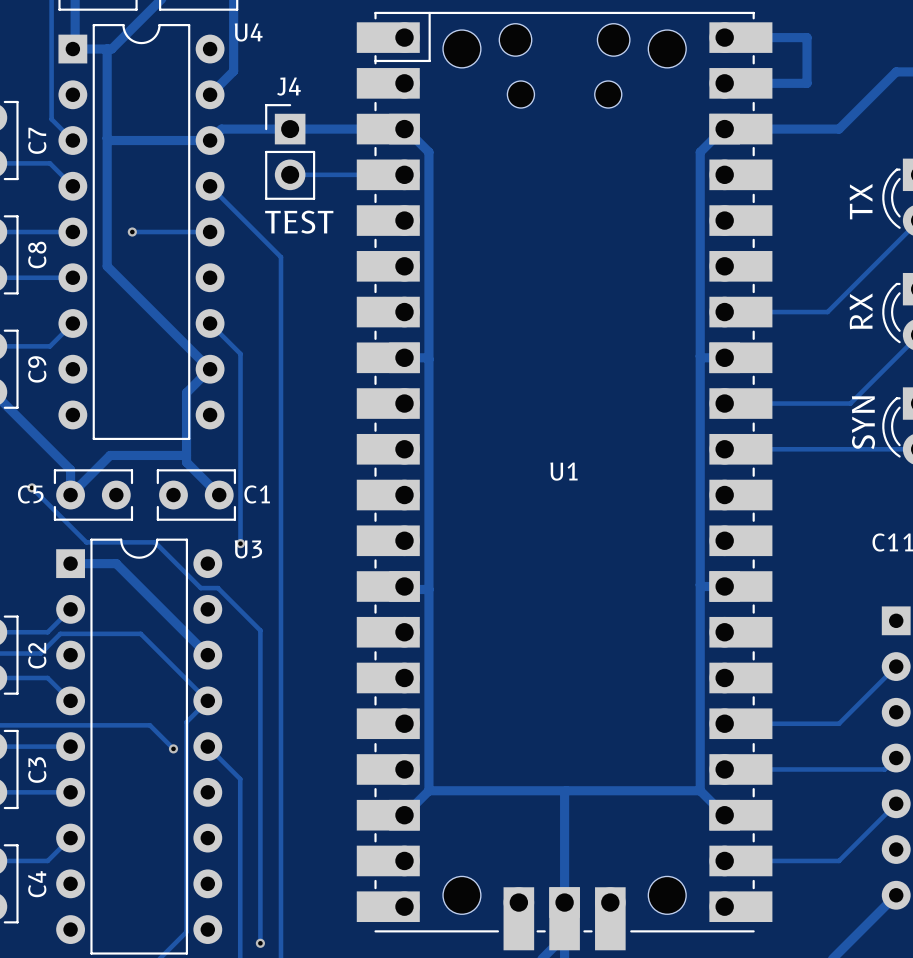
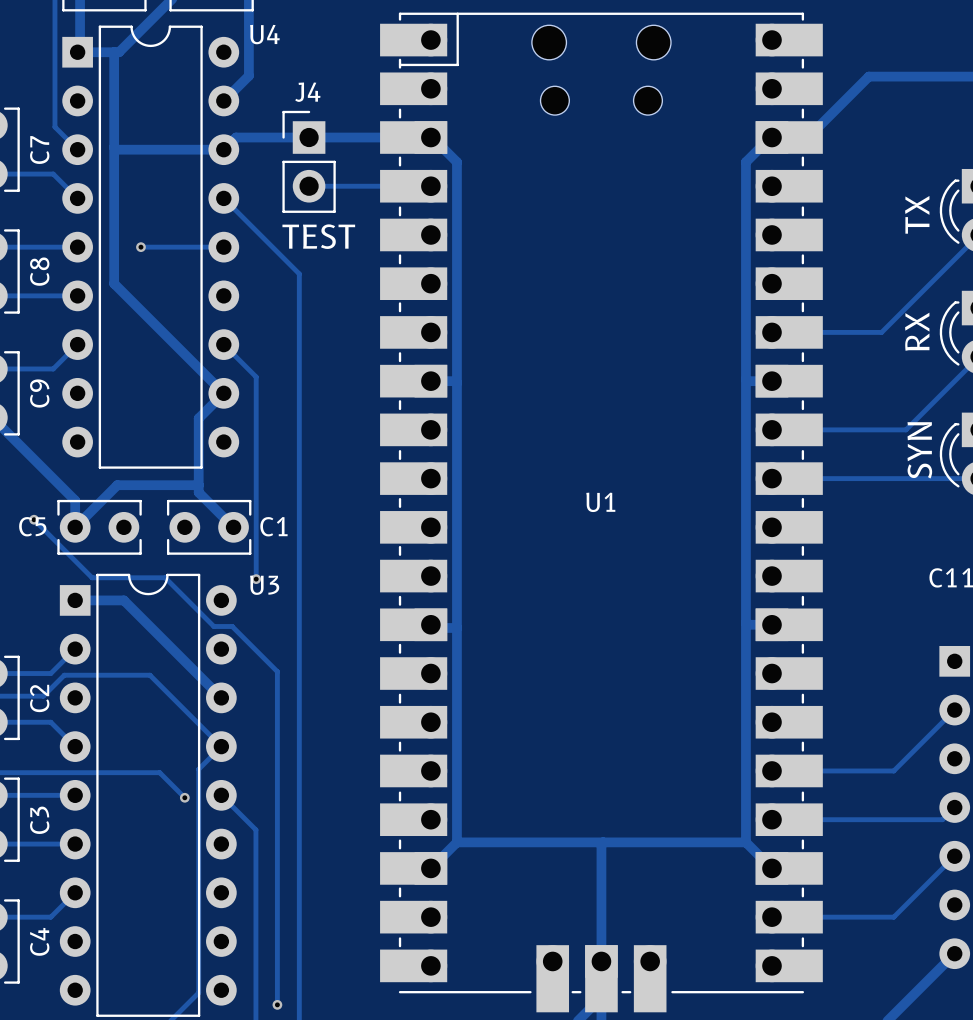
U1 footprint: [356, 11, 773, 951] -> [380, 12, 823, 1013]
track: (724, 37) (807, 37) (807, 83) (724, 83) -> none
track: (896, 71) (839, 129) (758, 129) -> (954, 76) (868, 76) (807, 137)

